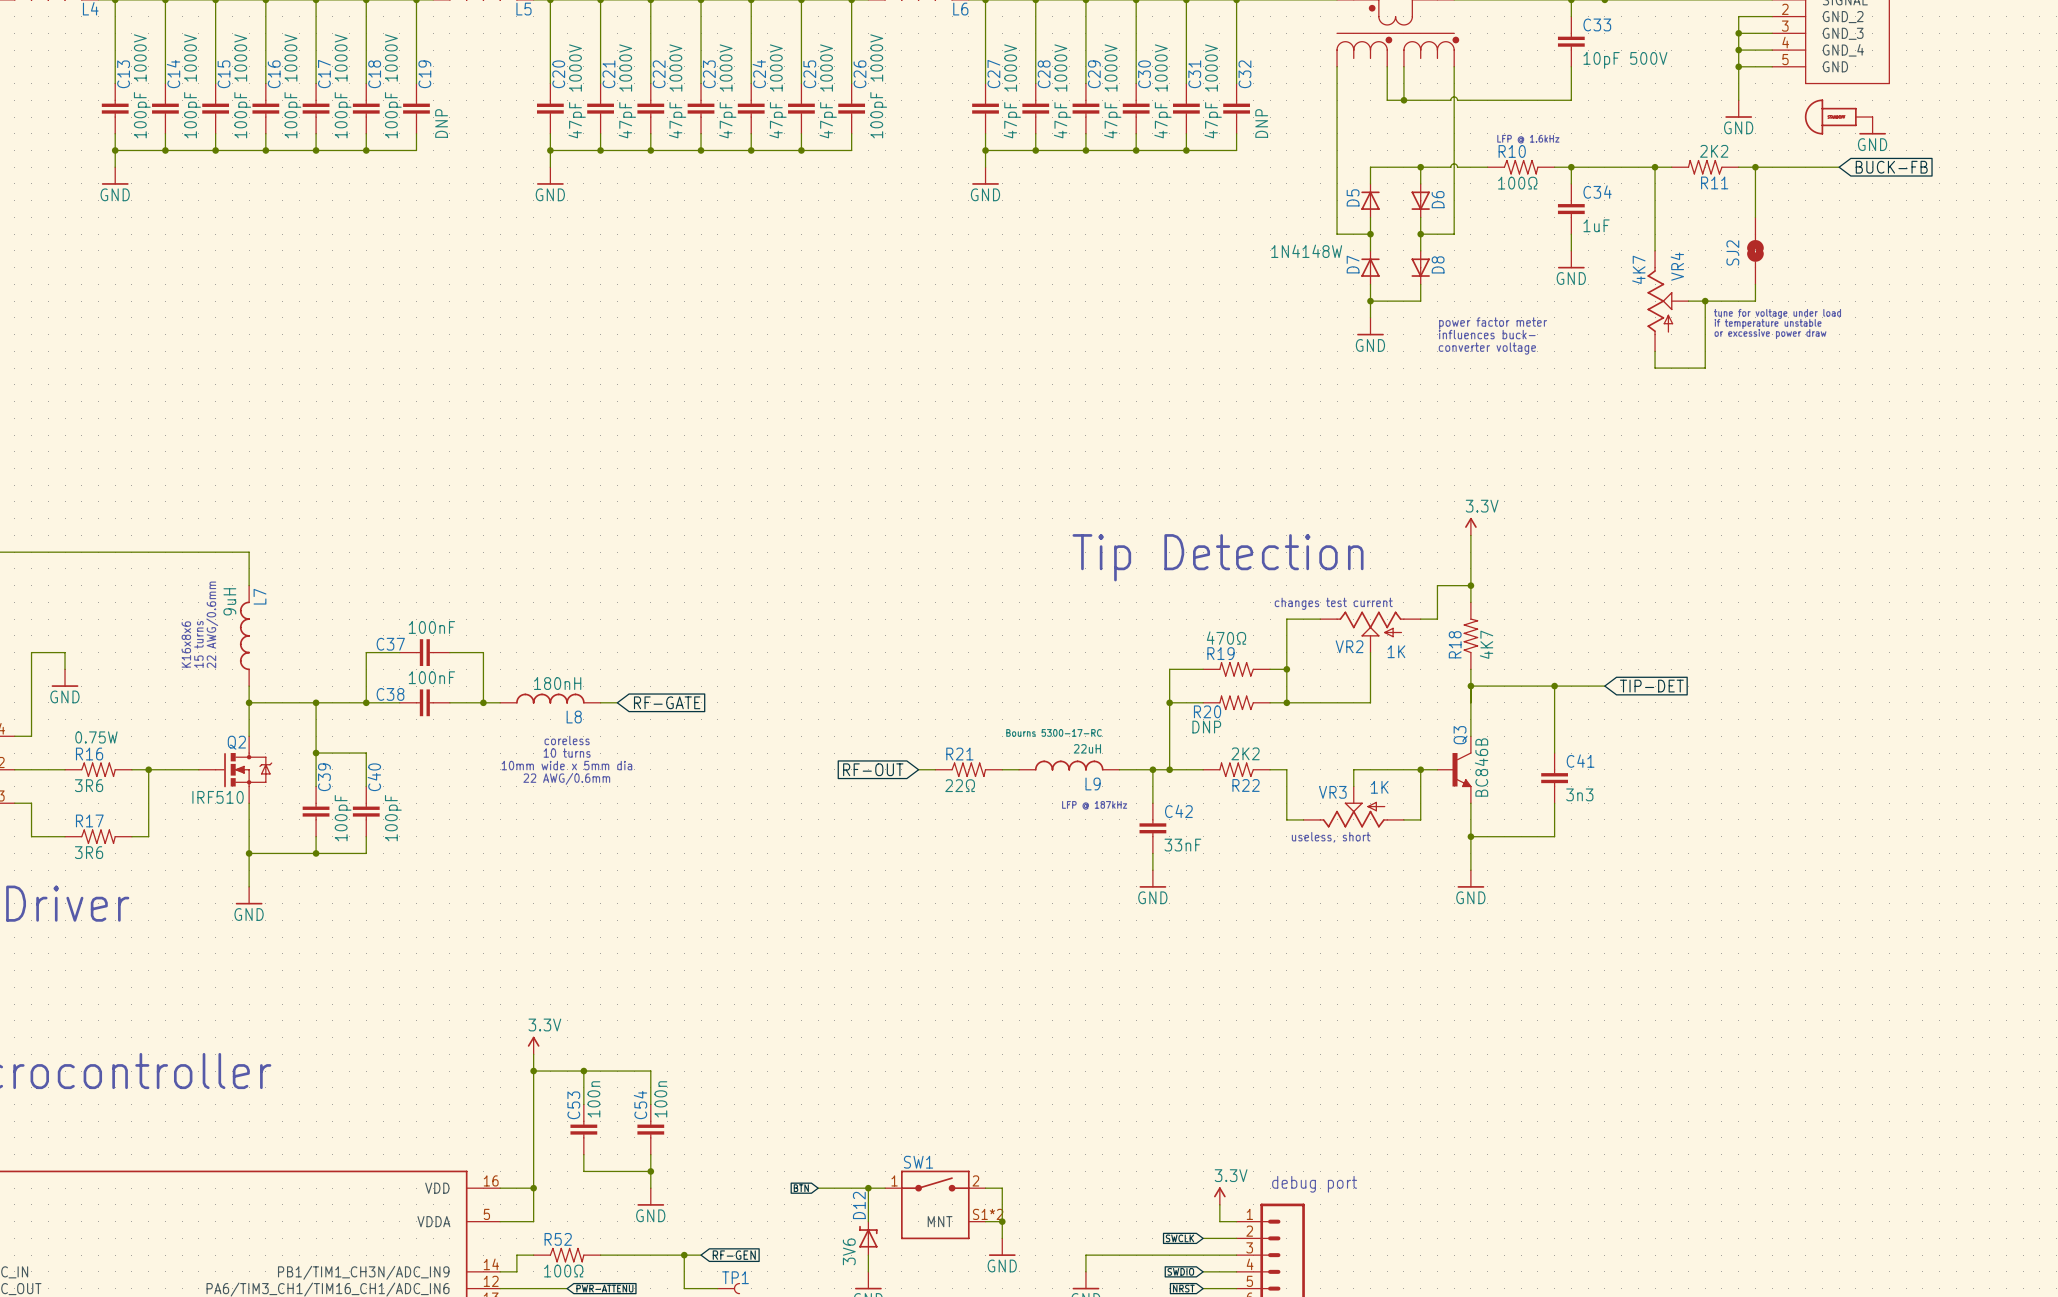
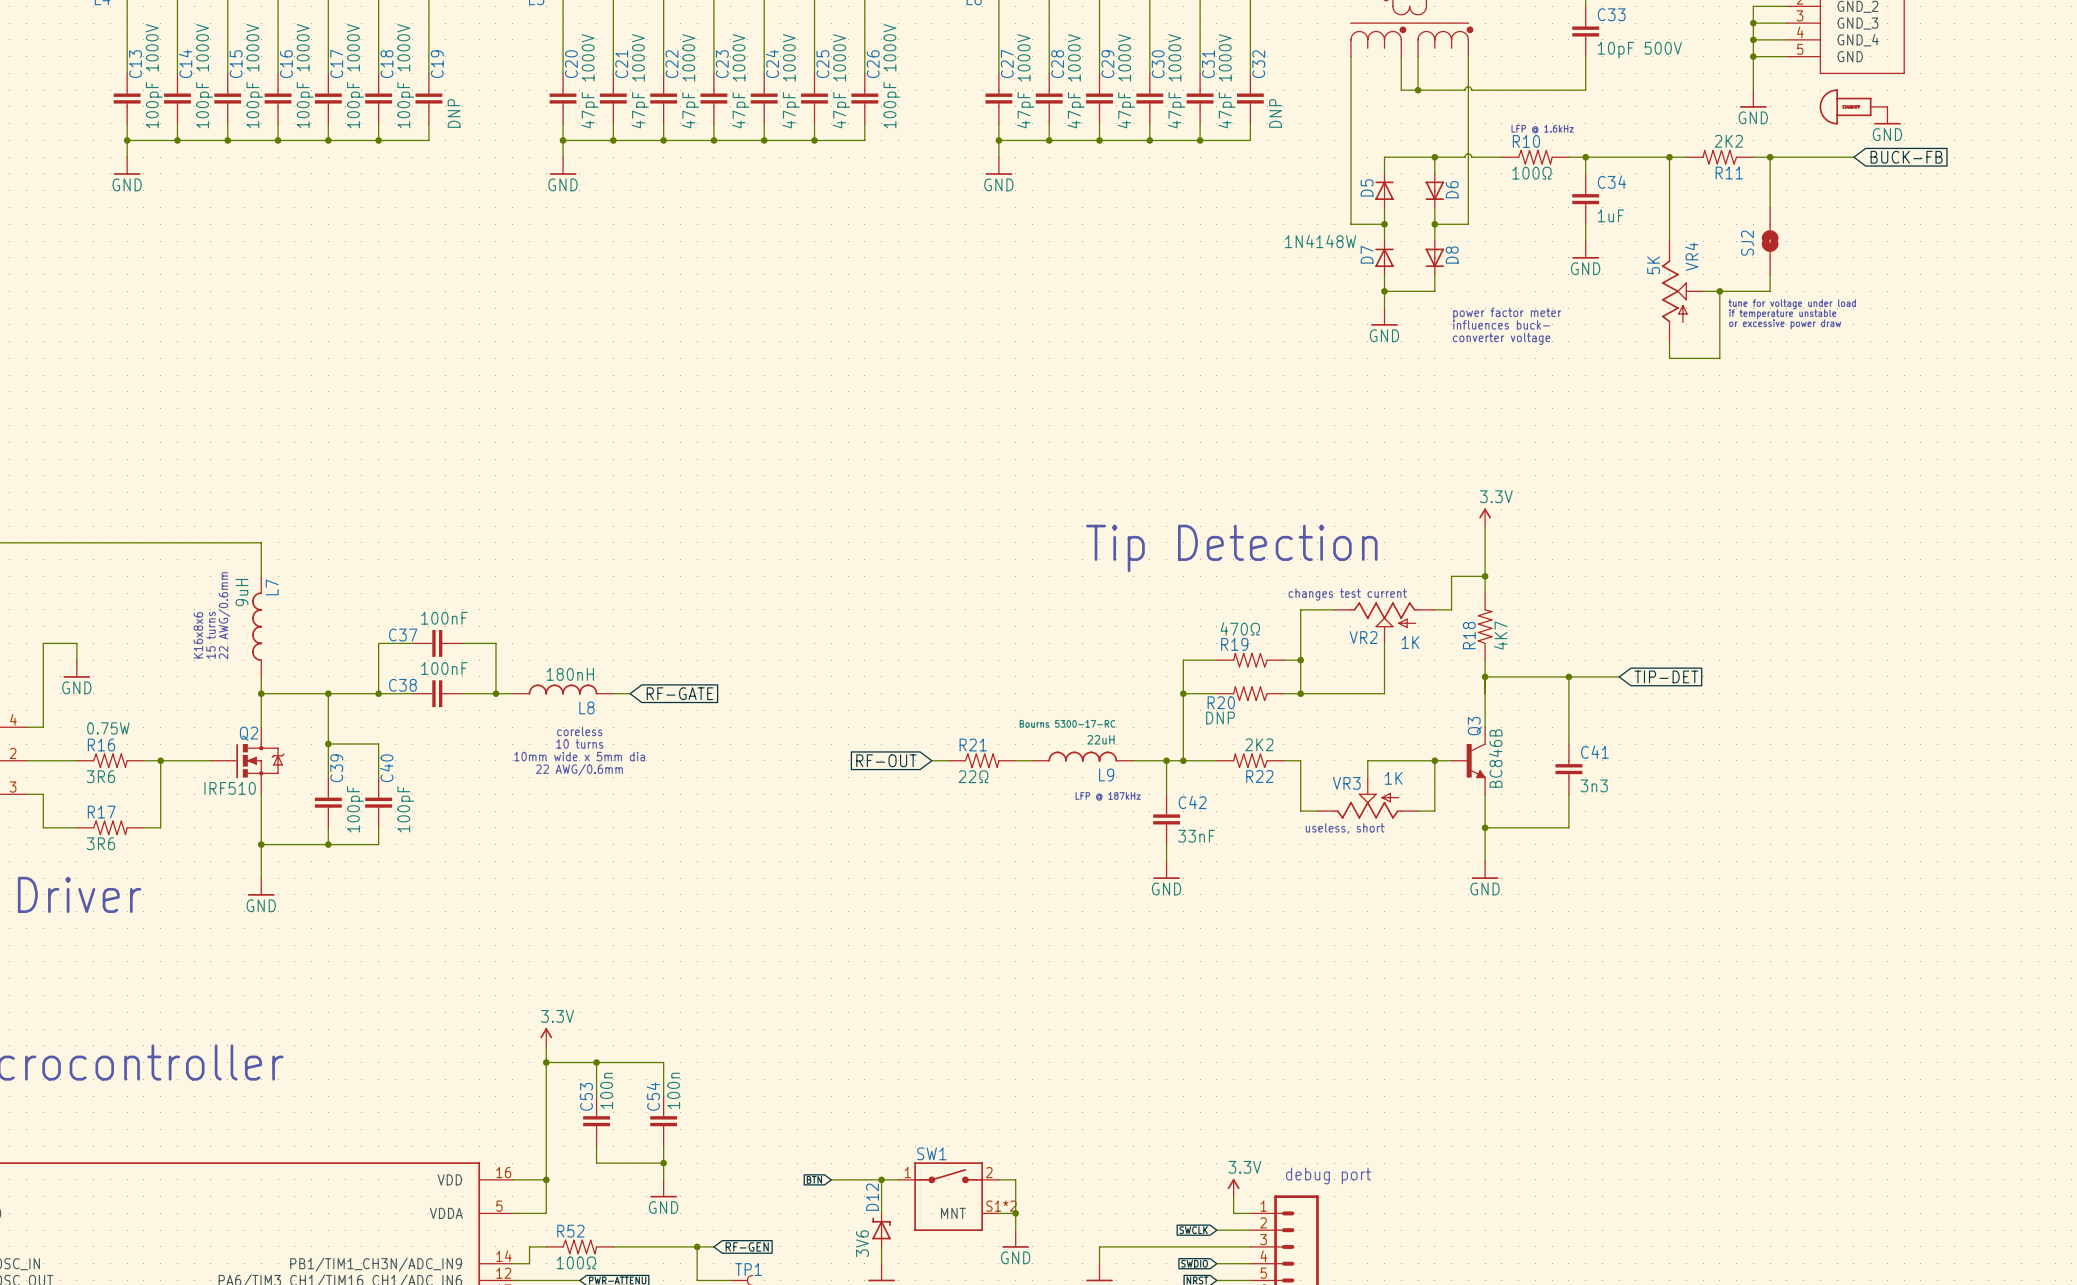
VR4 value: 4K7 (1638, 269) -> 5K (1653, 265)

